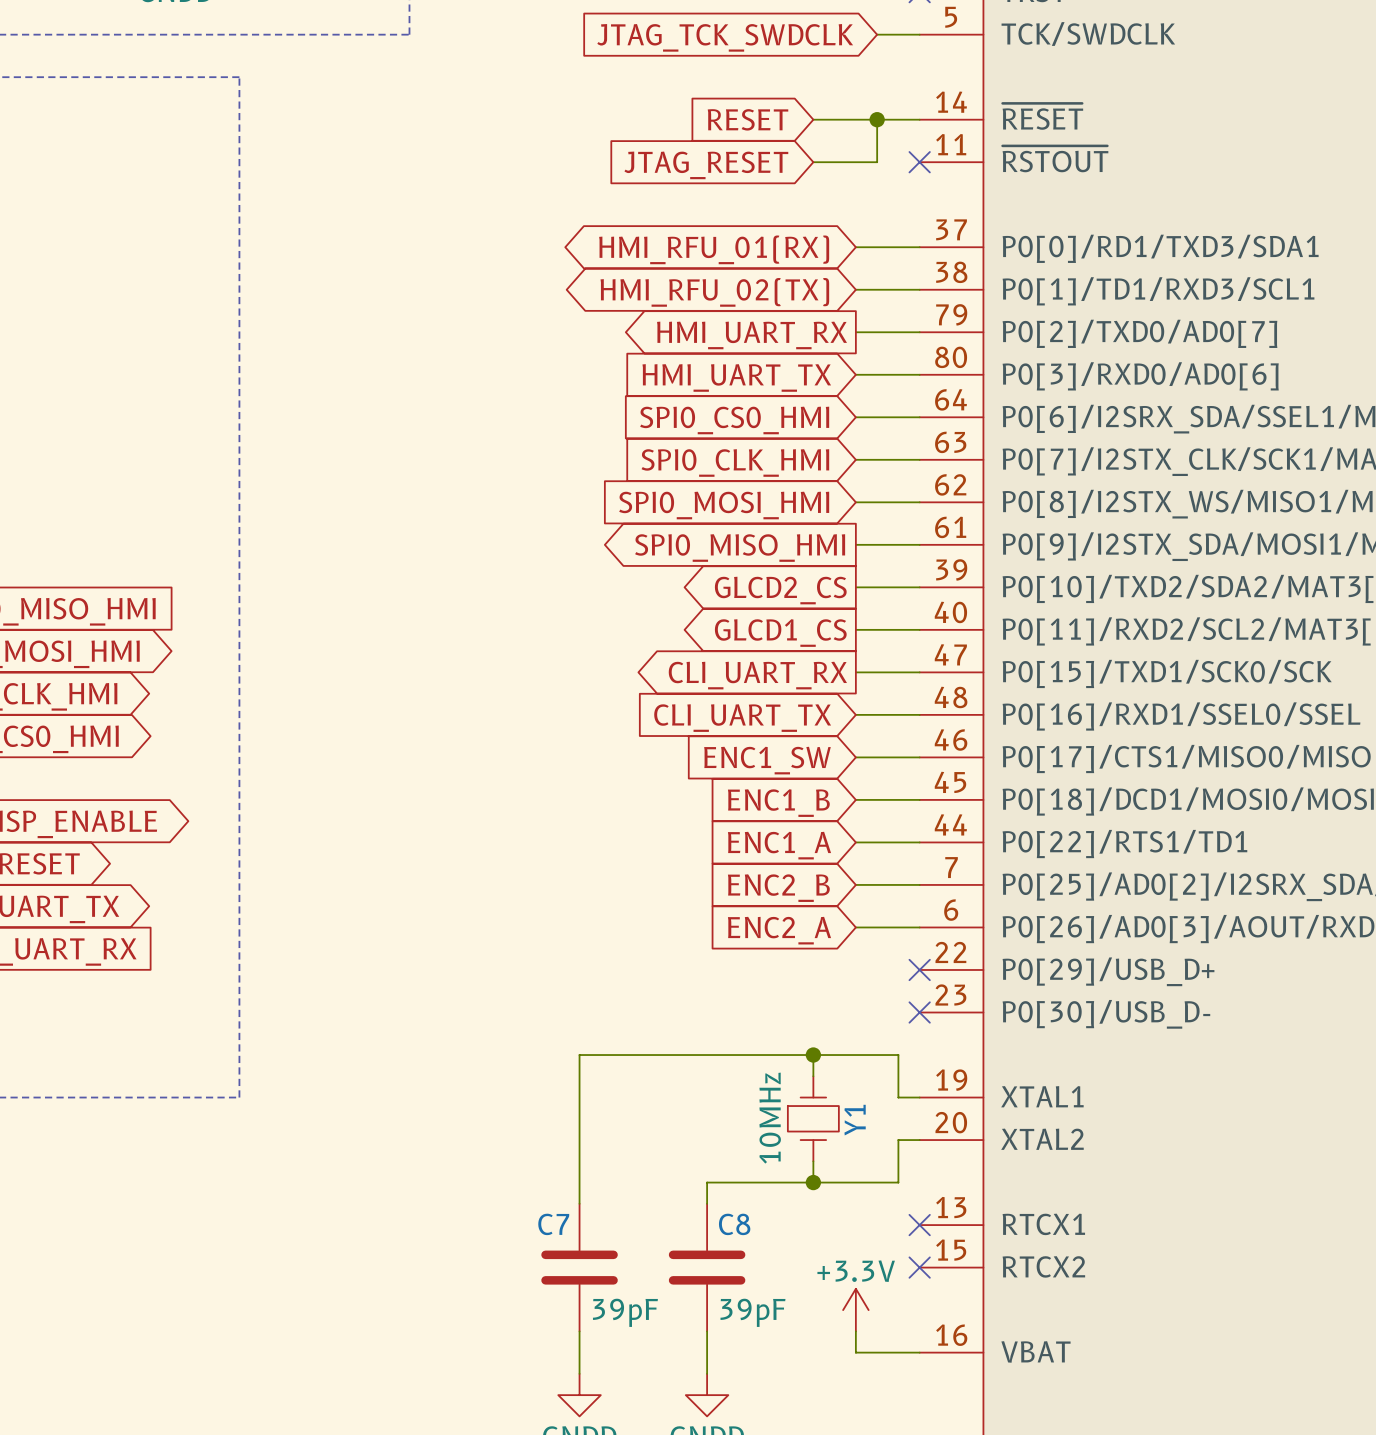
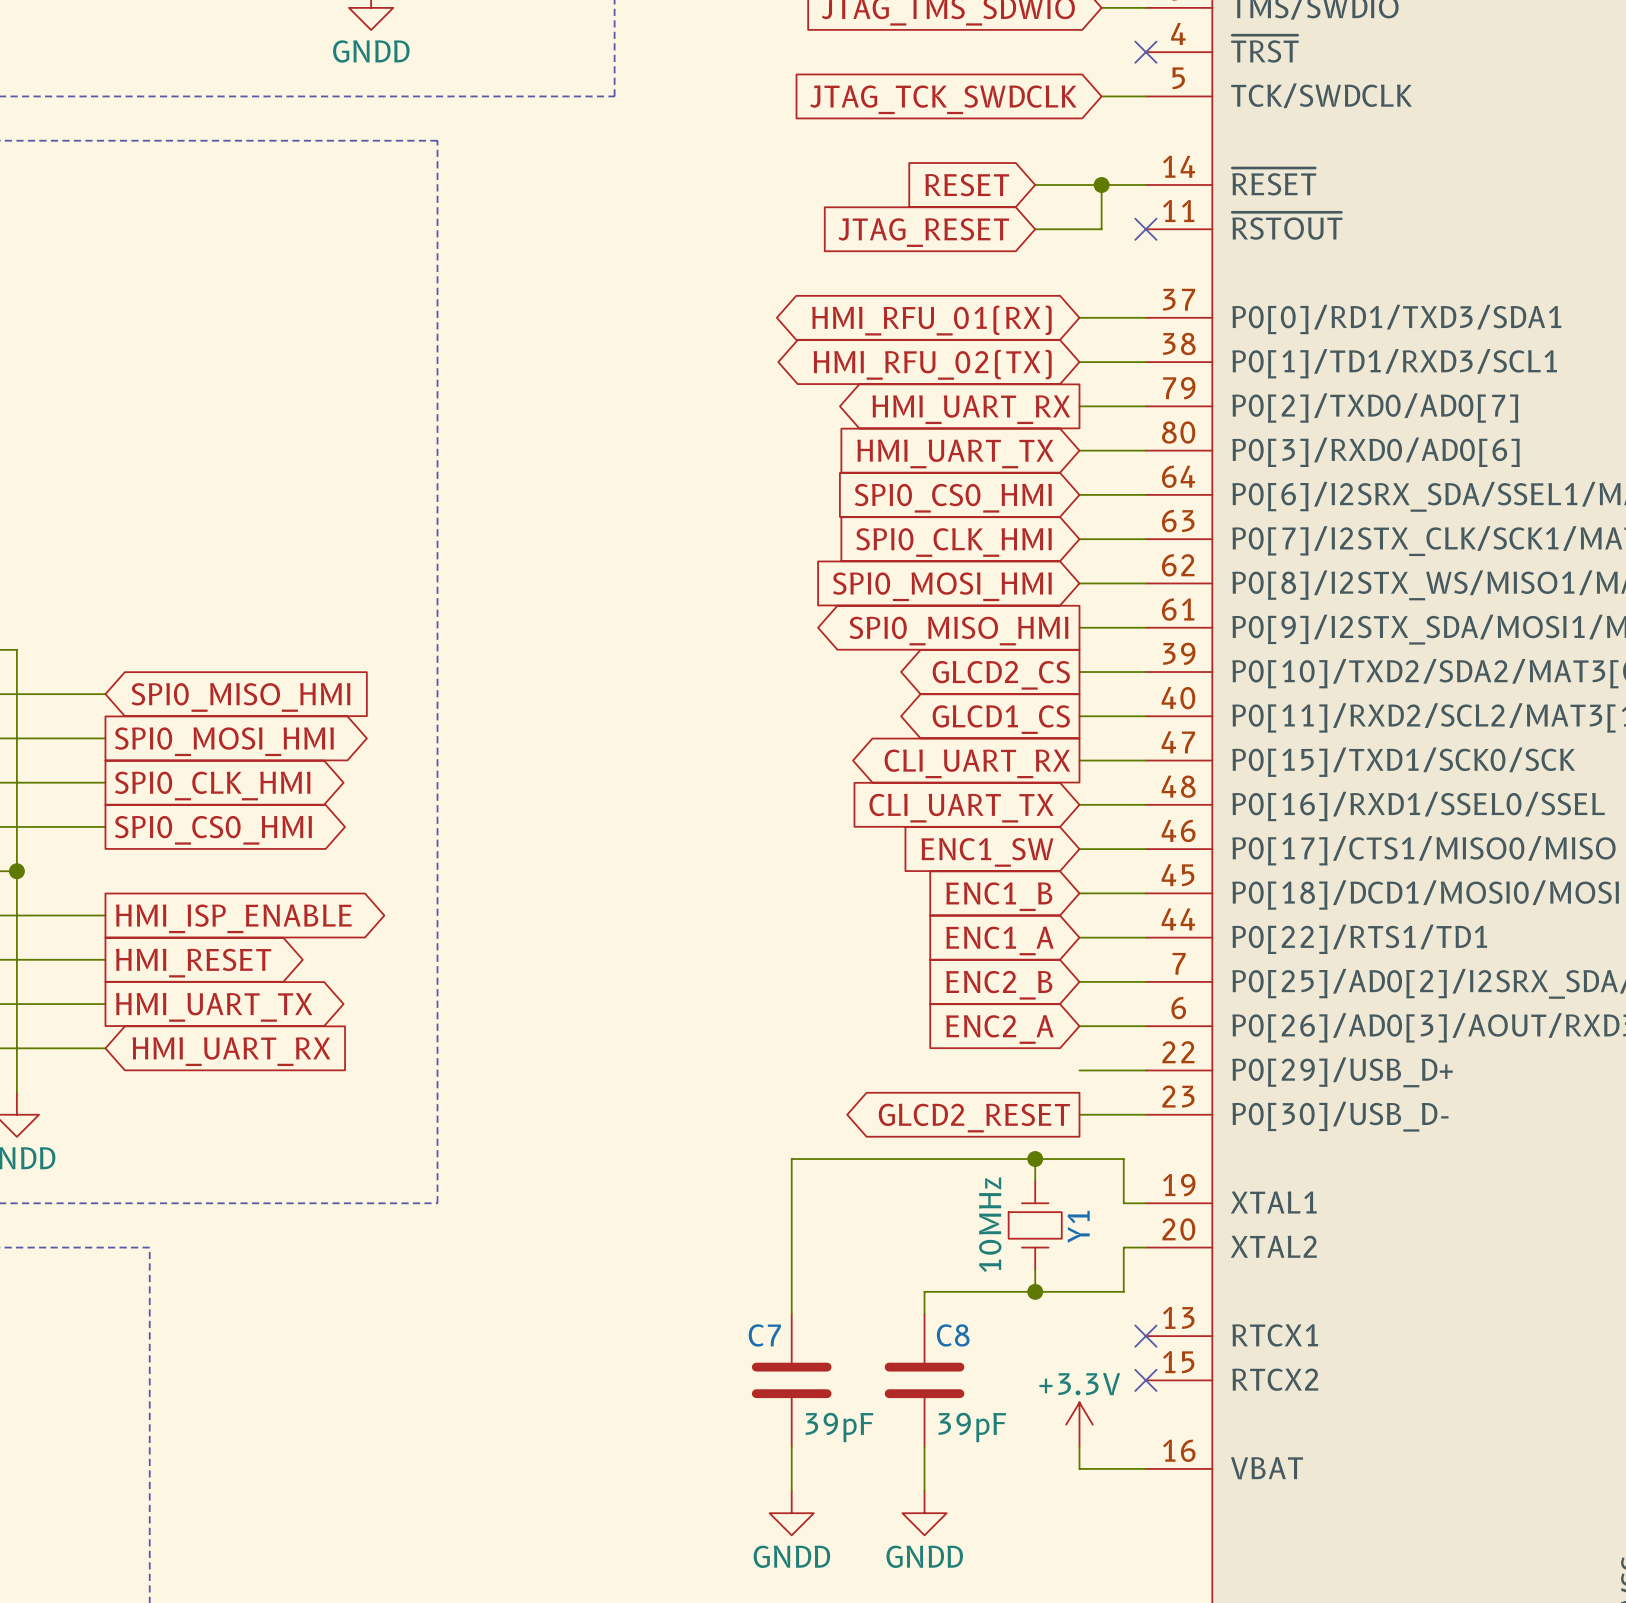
wire: none -> (1079, 1070) (1145, 1070)
no-connect mark: (919, 969) -> none
wire: none -> (1079, 1114) (1145, 1114)
no-connect mark: (919, 1012) -> none
global label: none -> GLCD2_RESET (974, 1118)

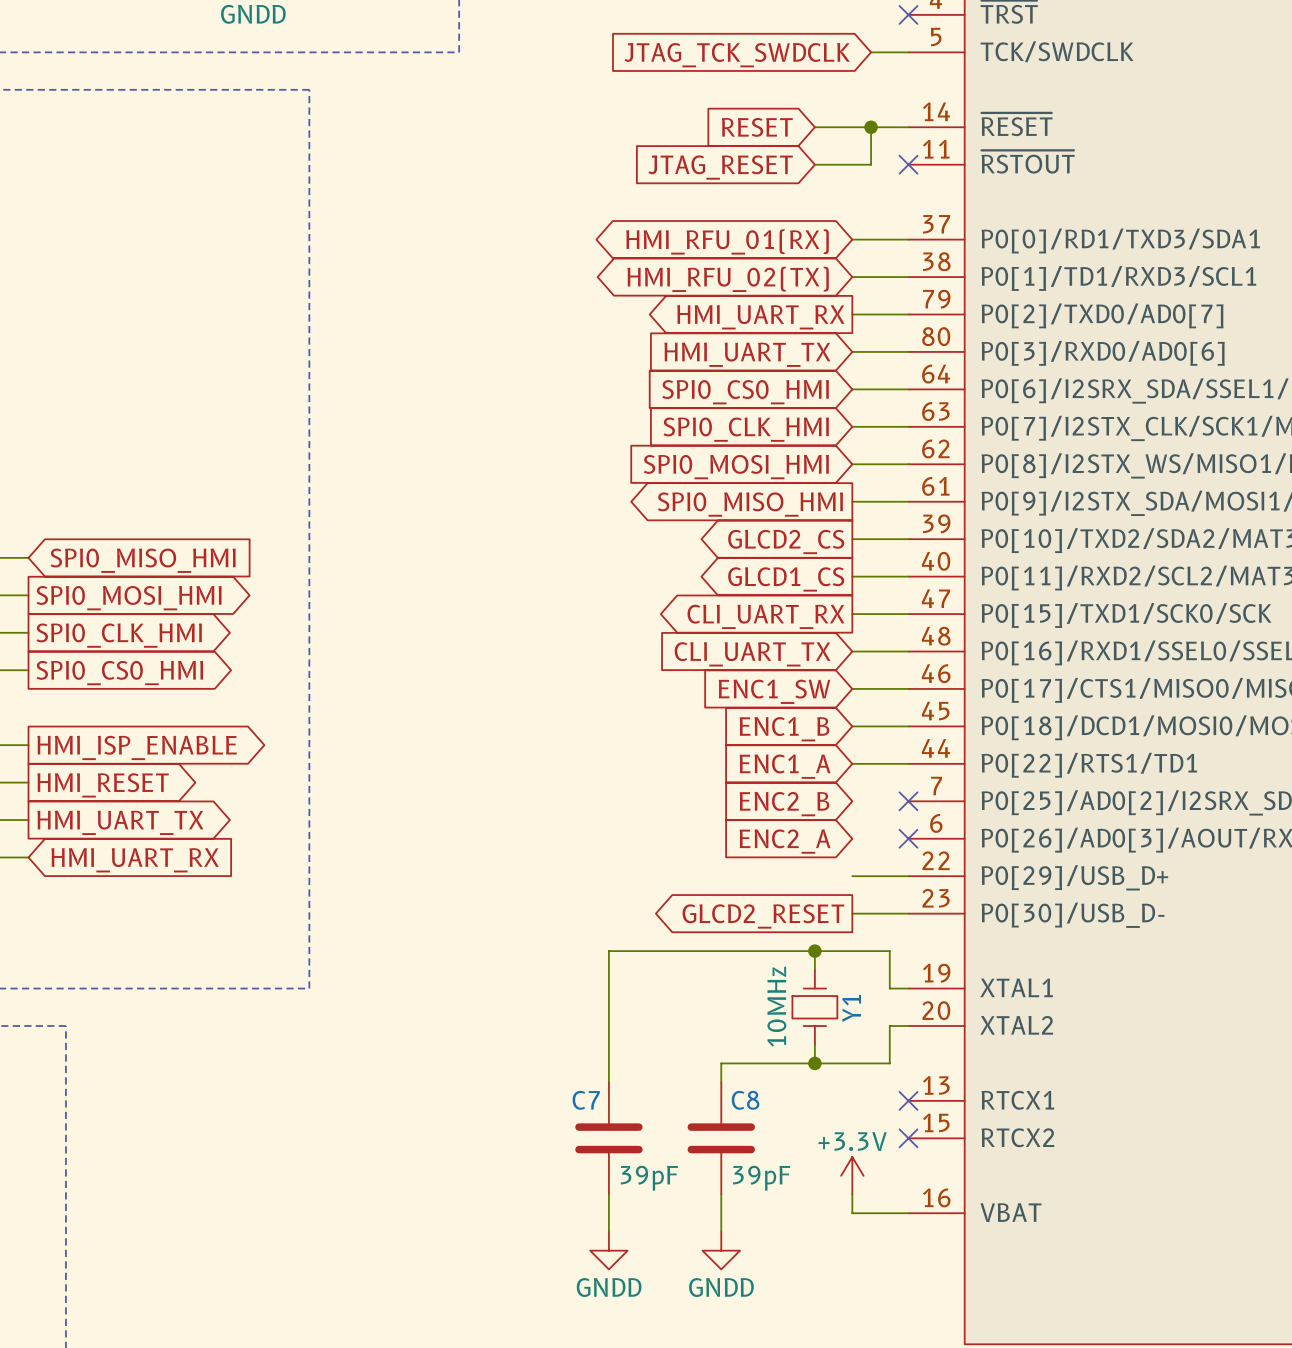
wire: (1079, 981) (1145, 981) -> none
no-connect mark: none -> (908, 801)
wire: (1079, 1026) (1145, 1026) -> none
no-connect mark: none -> (908, 838)

